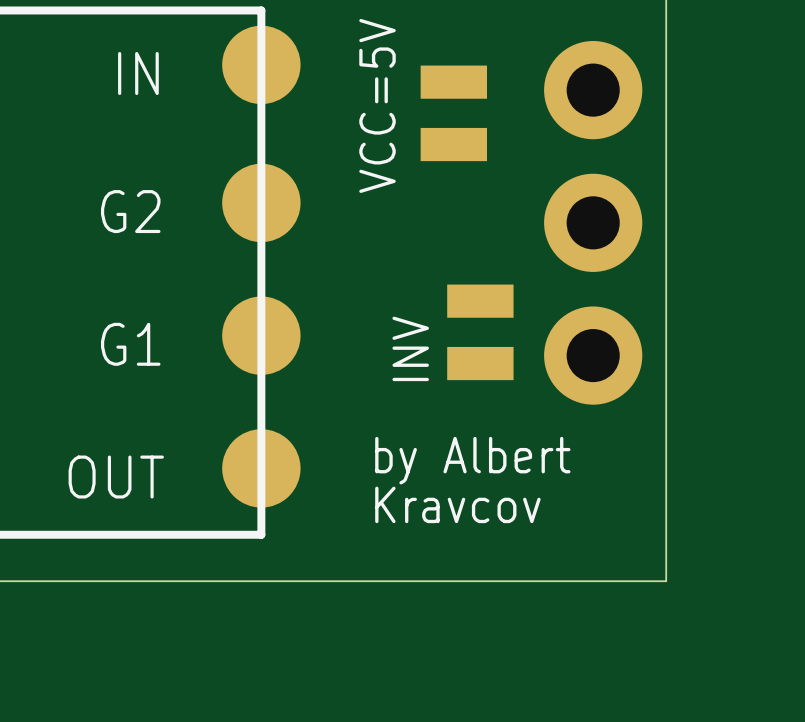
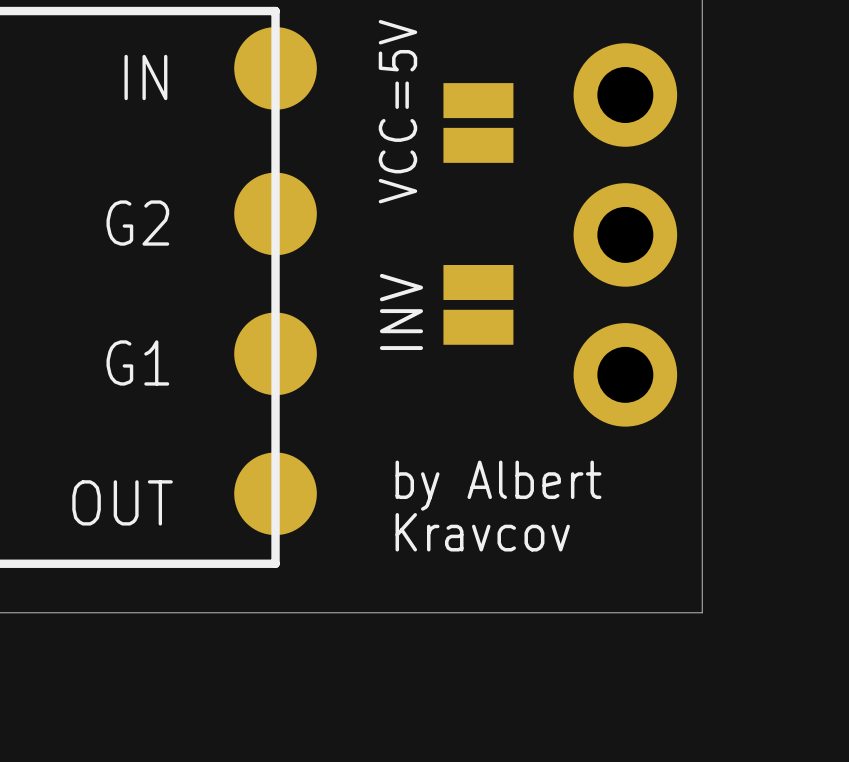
part footprint: [420, 65, 488, 162] -> [443, 83, 514, 163]
INV: none -> (478, 304)
part: (480, 332) -> none
text: INV (410, 348) -> none

